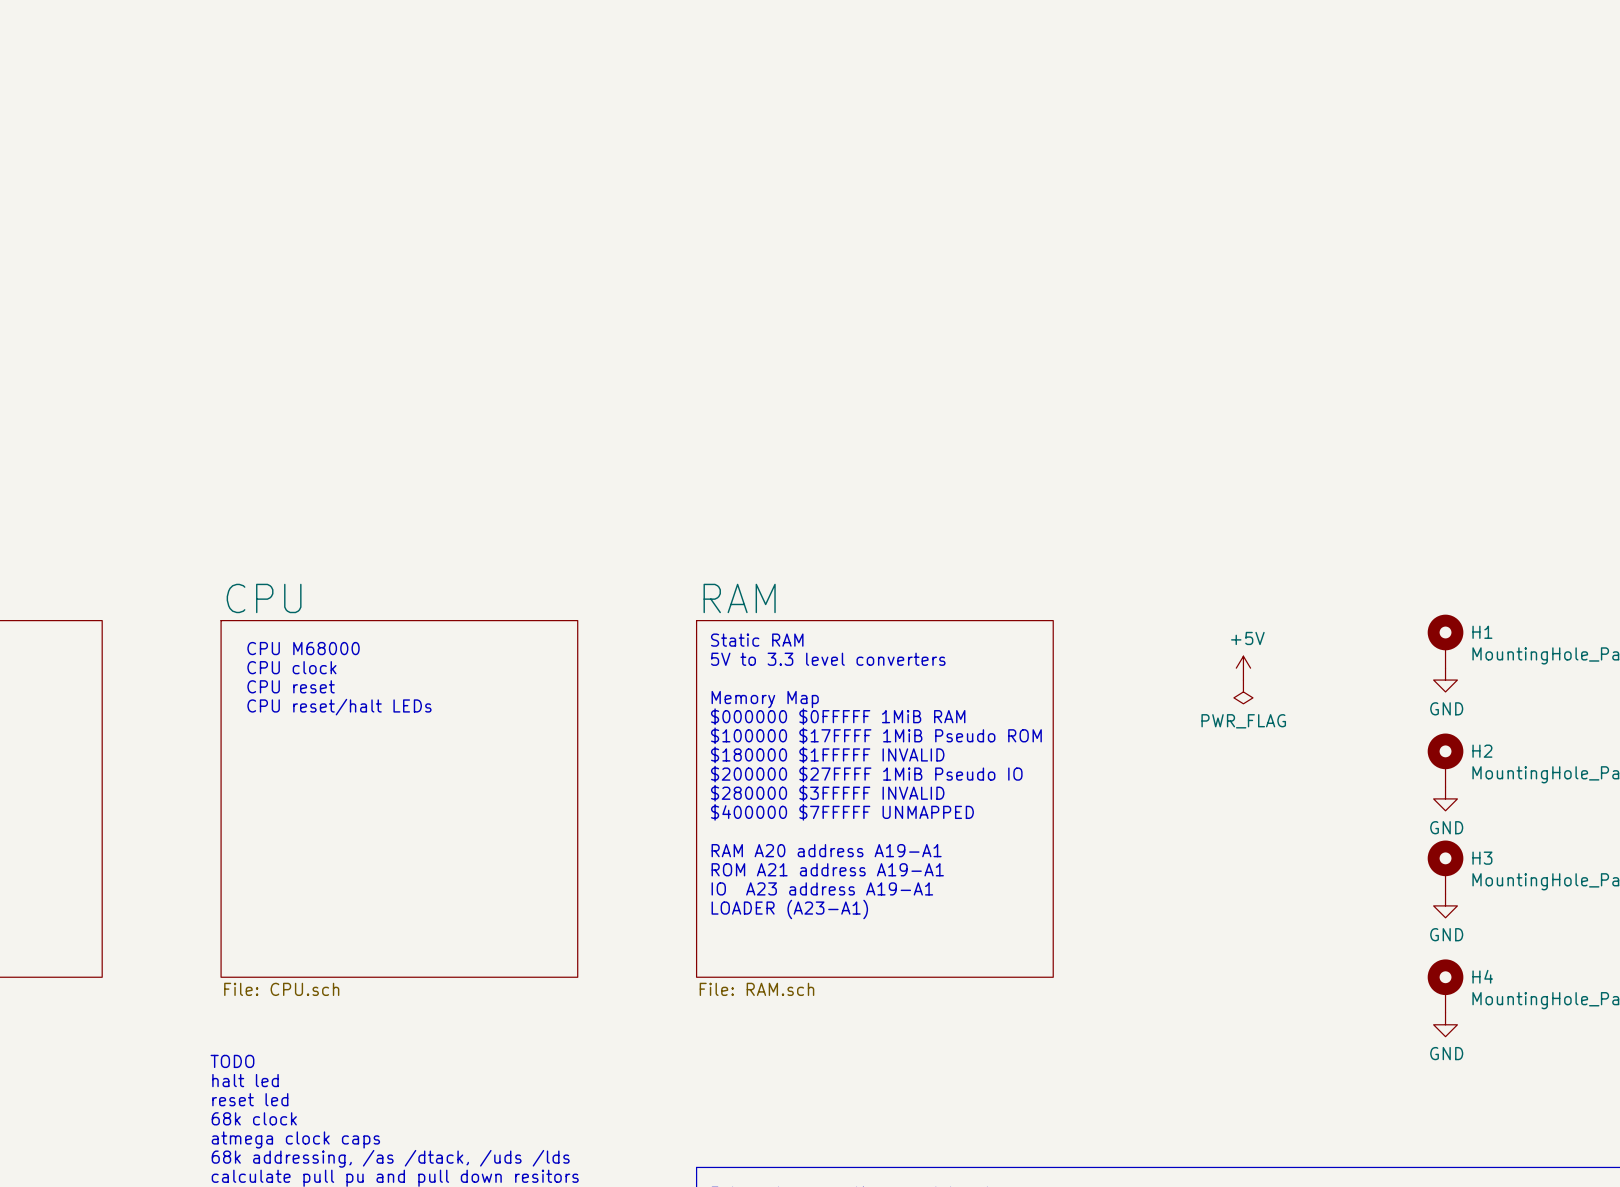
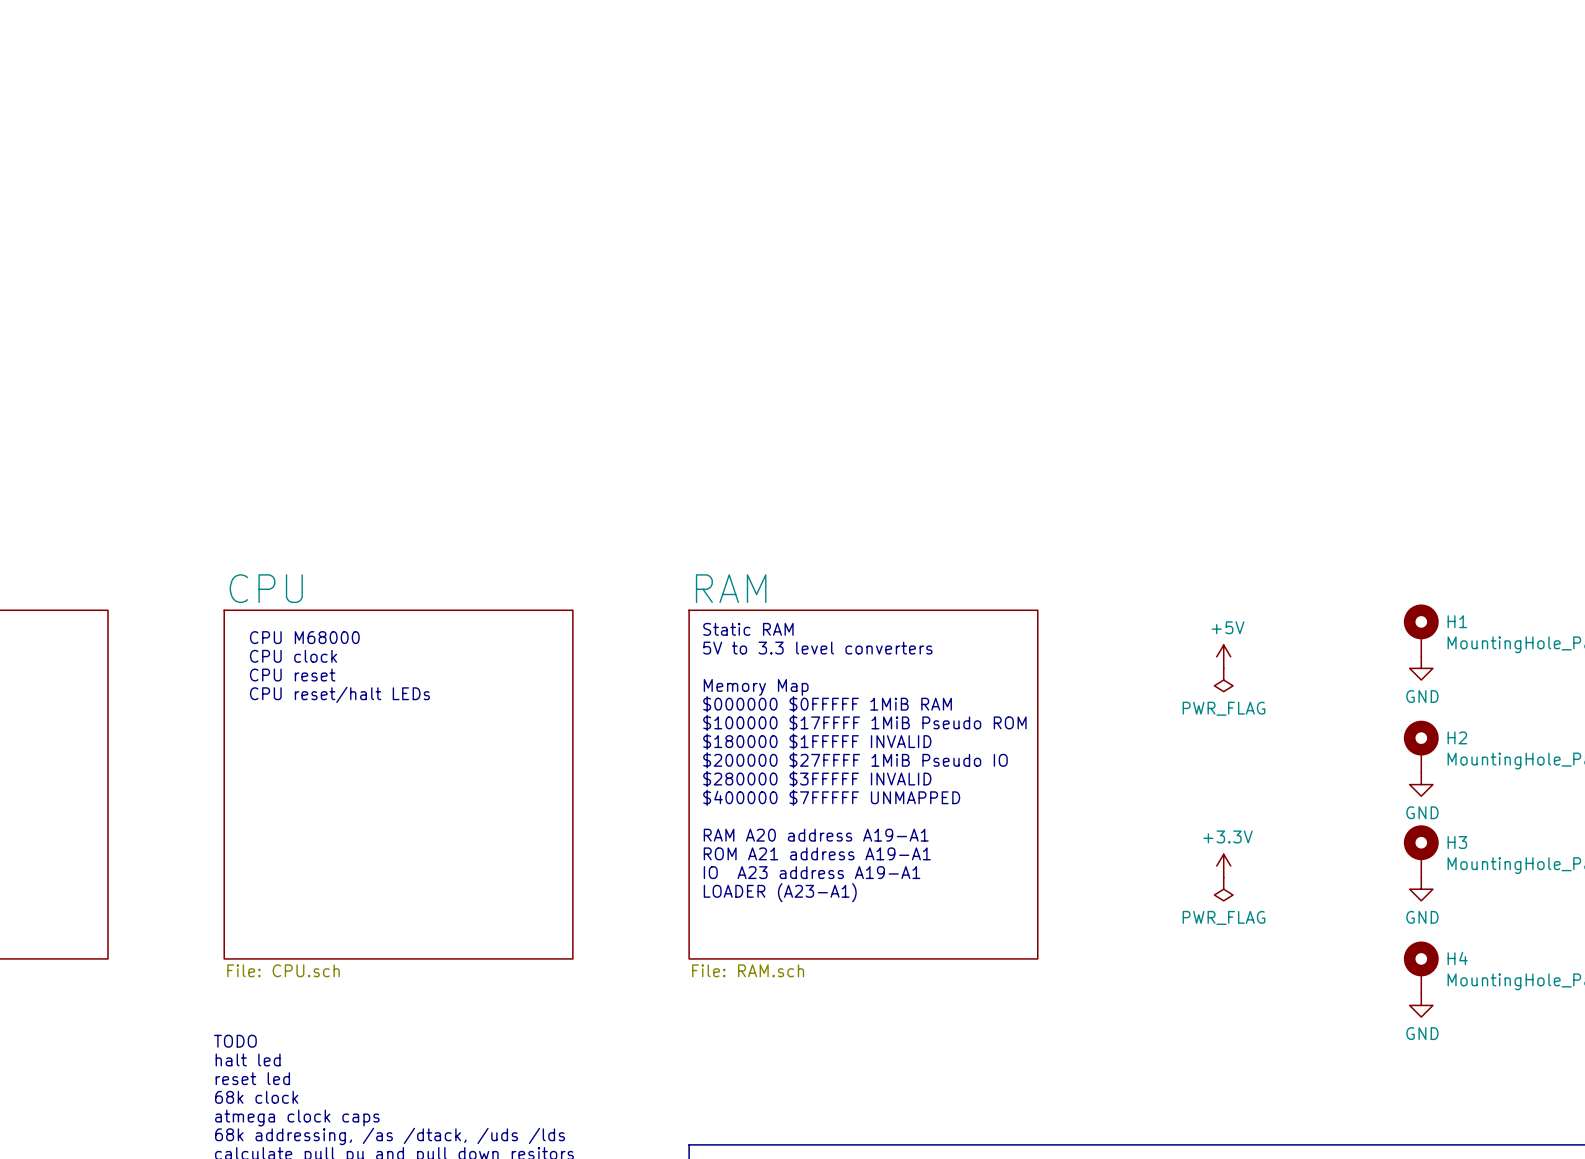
power symbol: none -> +3.3V (1223, 865)
power symbol: none -> PWR_FLAG (1223, 889)

